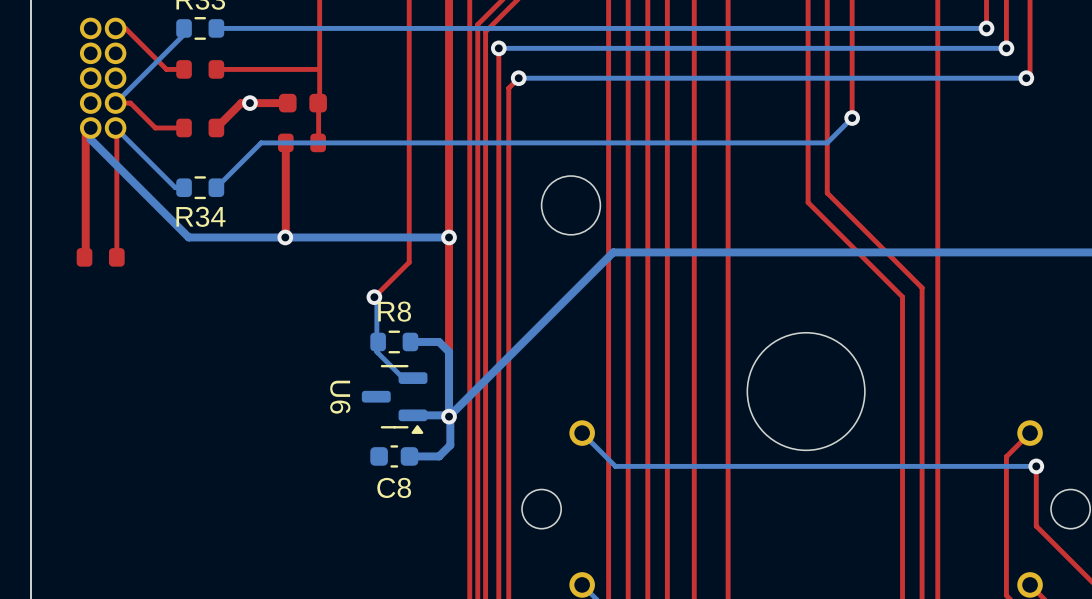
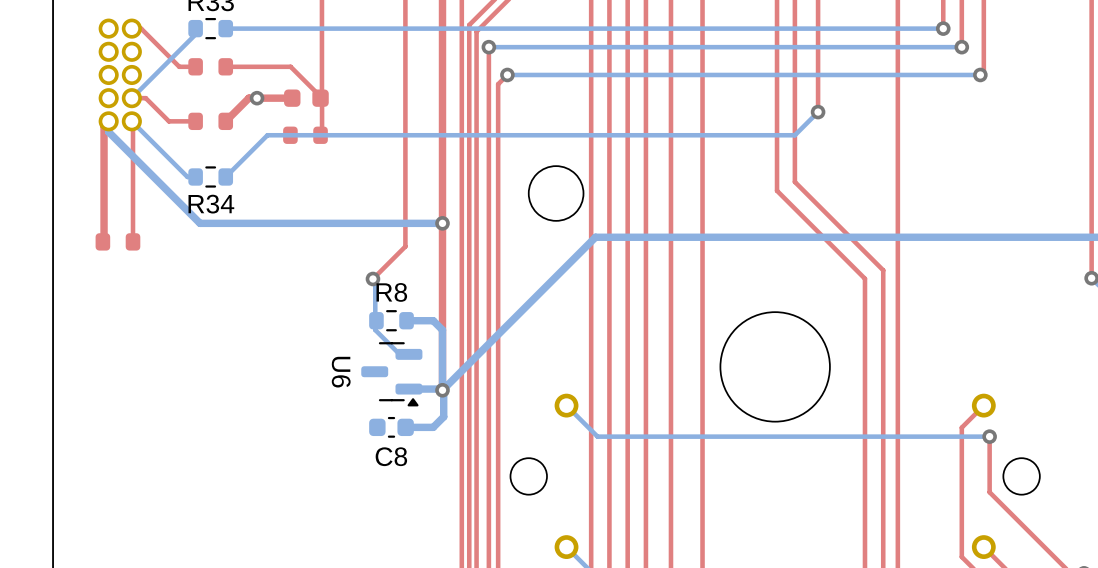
top track: (319, 69) (286, 69) -> none
top track: (319, 103) (319, 142) -> (290, 66) (322, 98) (321, 135)
top track: (285, 142) (285, 237) -> none
via: (285, 237) -> none

